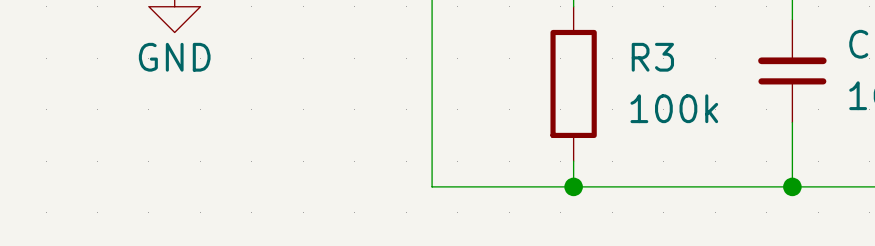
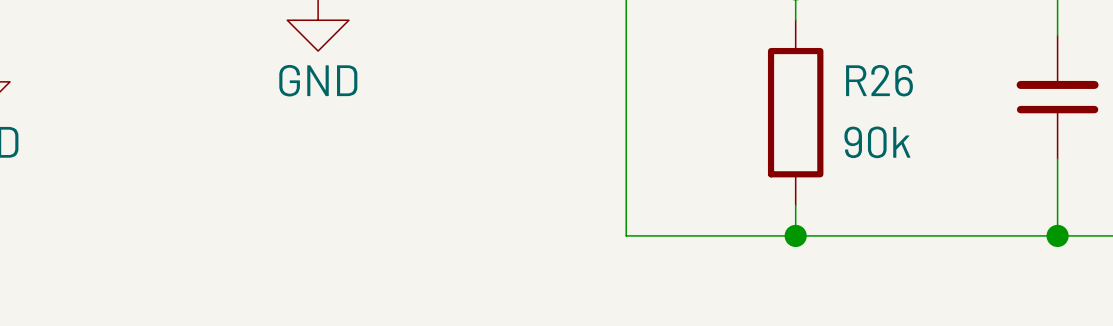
R3 name: R3 (652, 57) -> R26 (879, 80)
R3 value: 100k (674, 108) -> 90k (877, 142)

